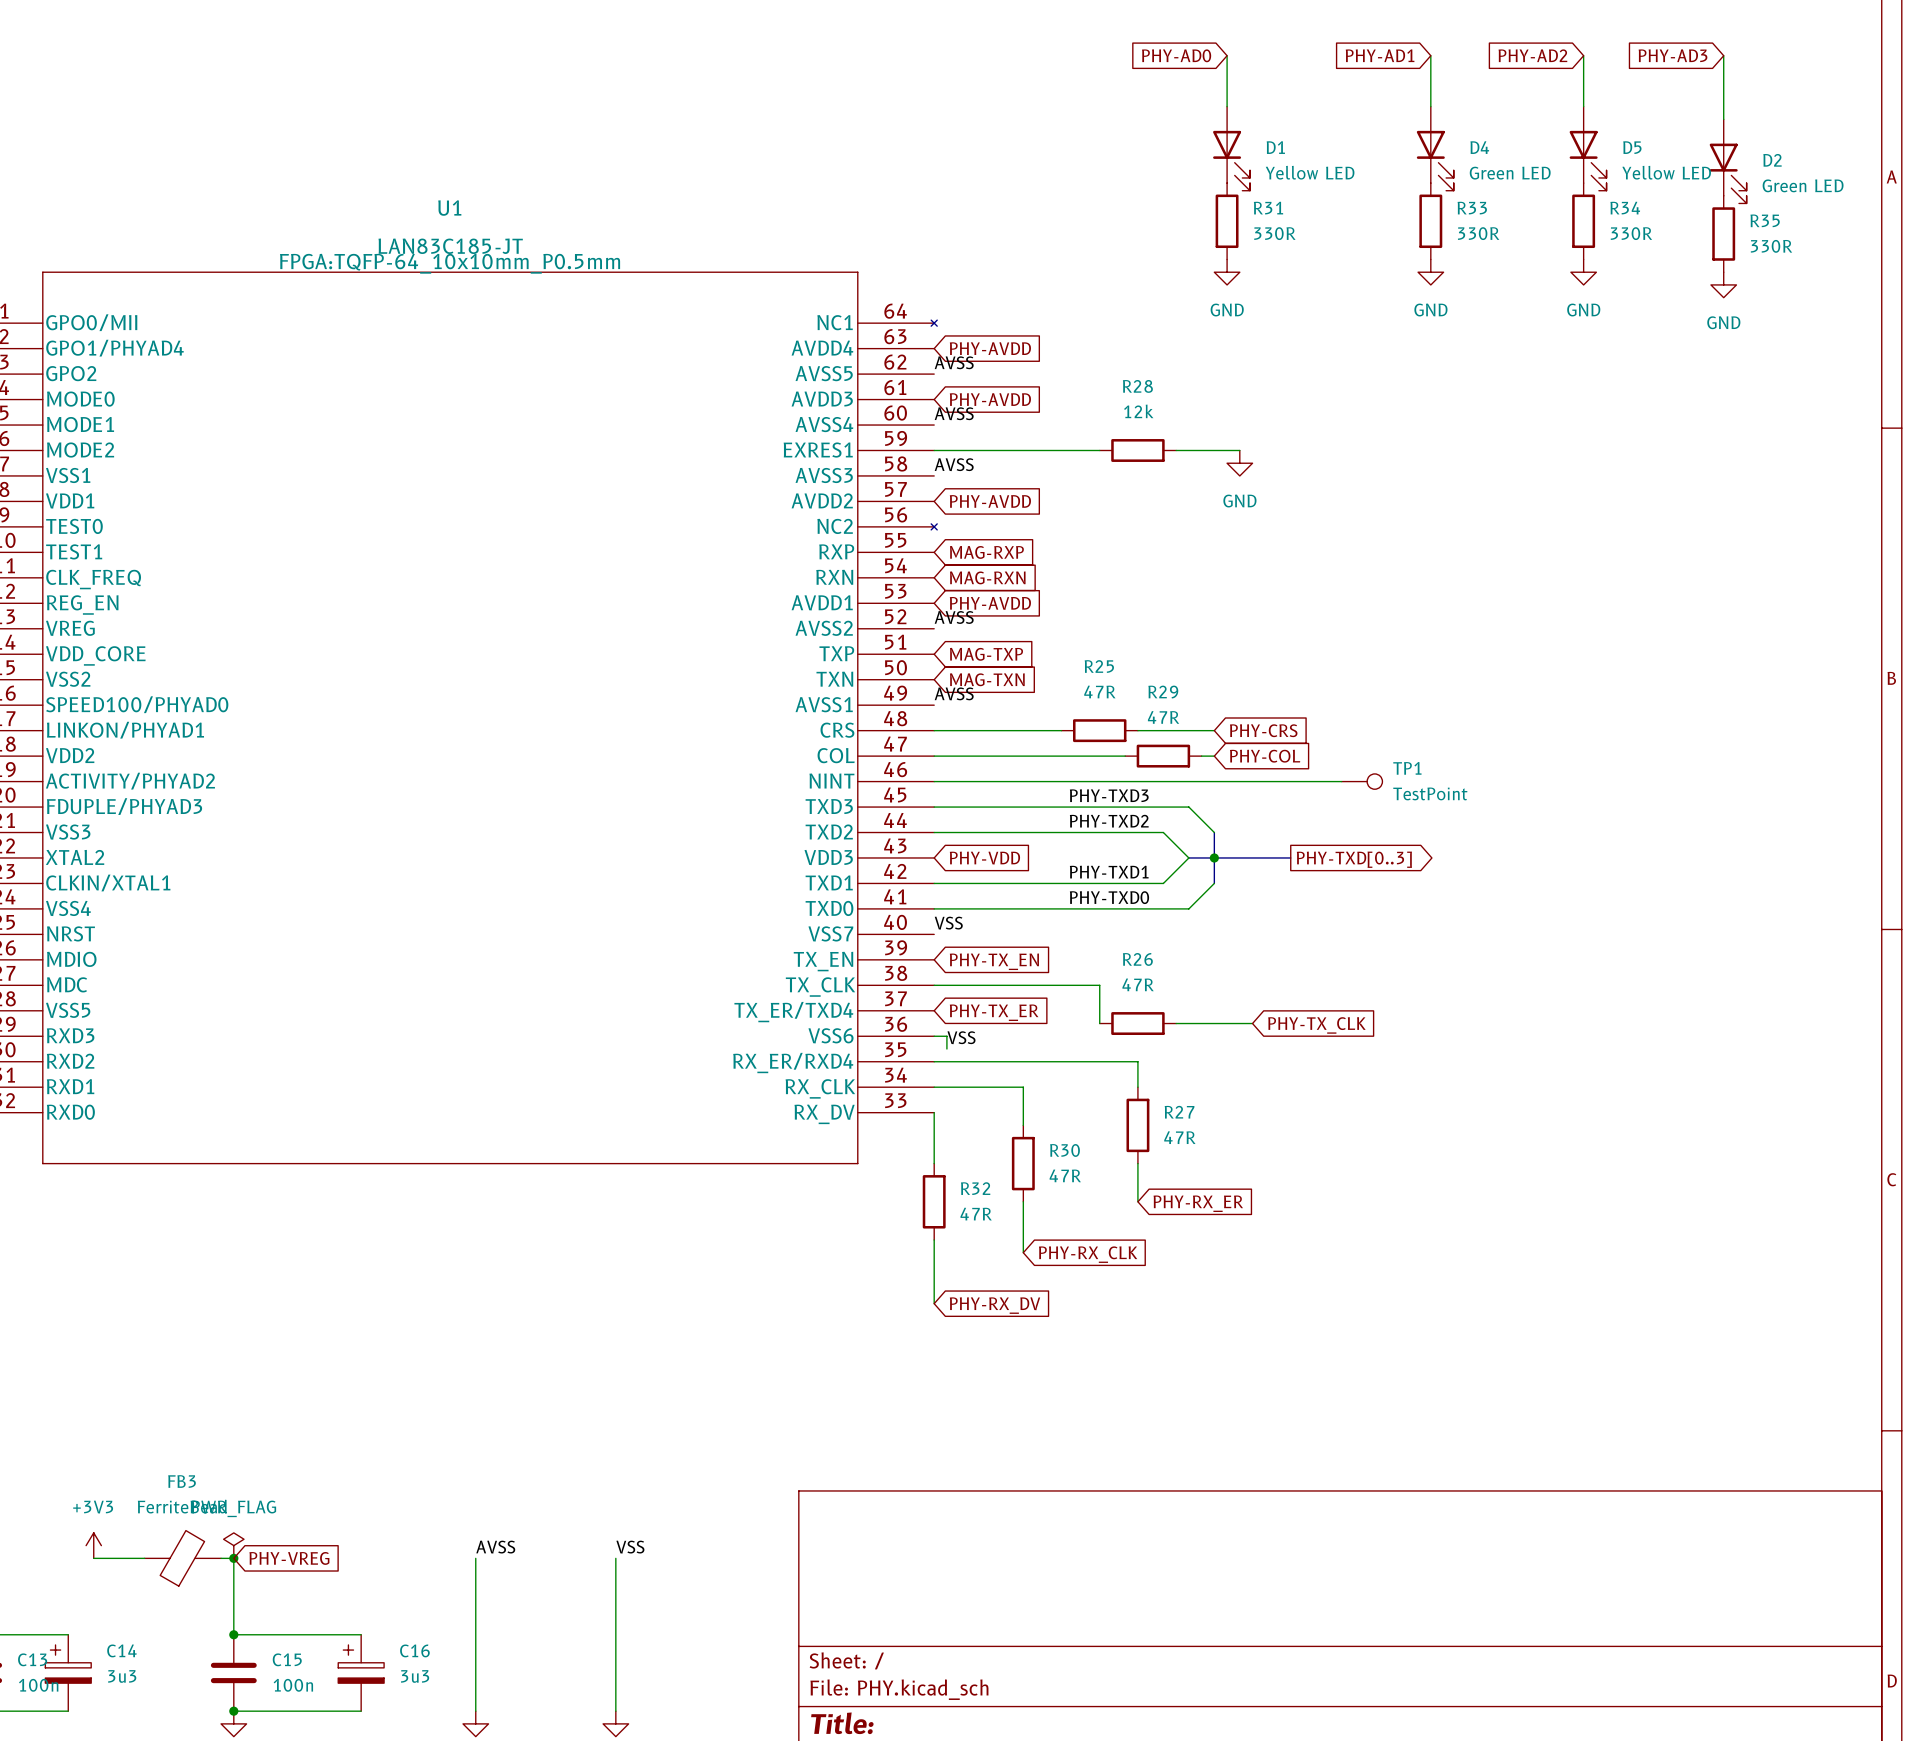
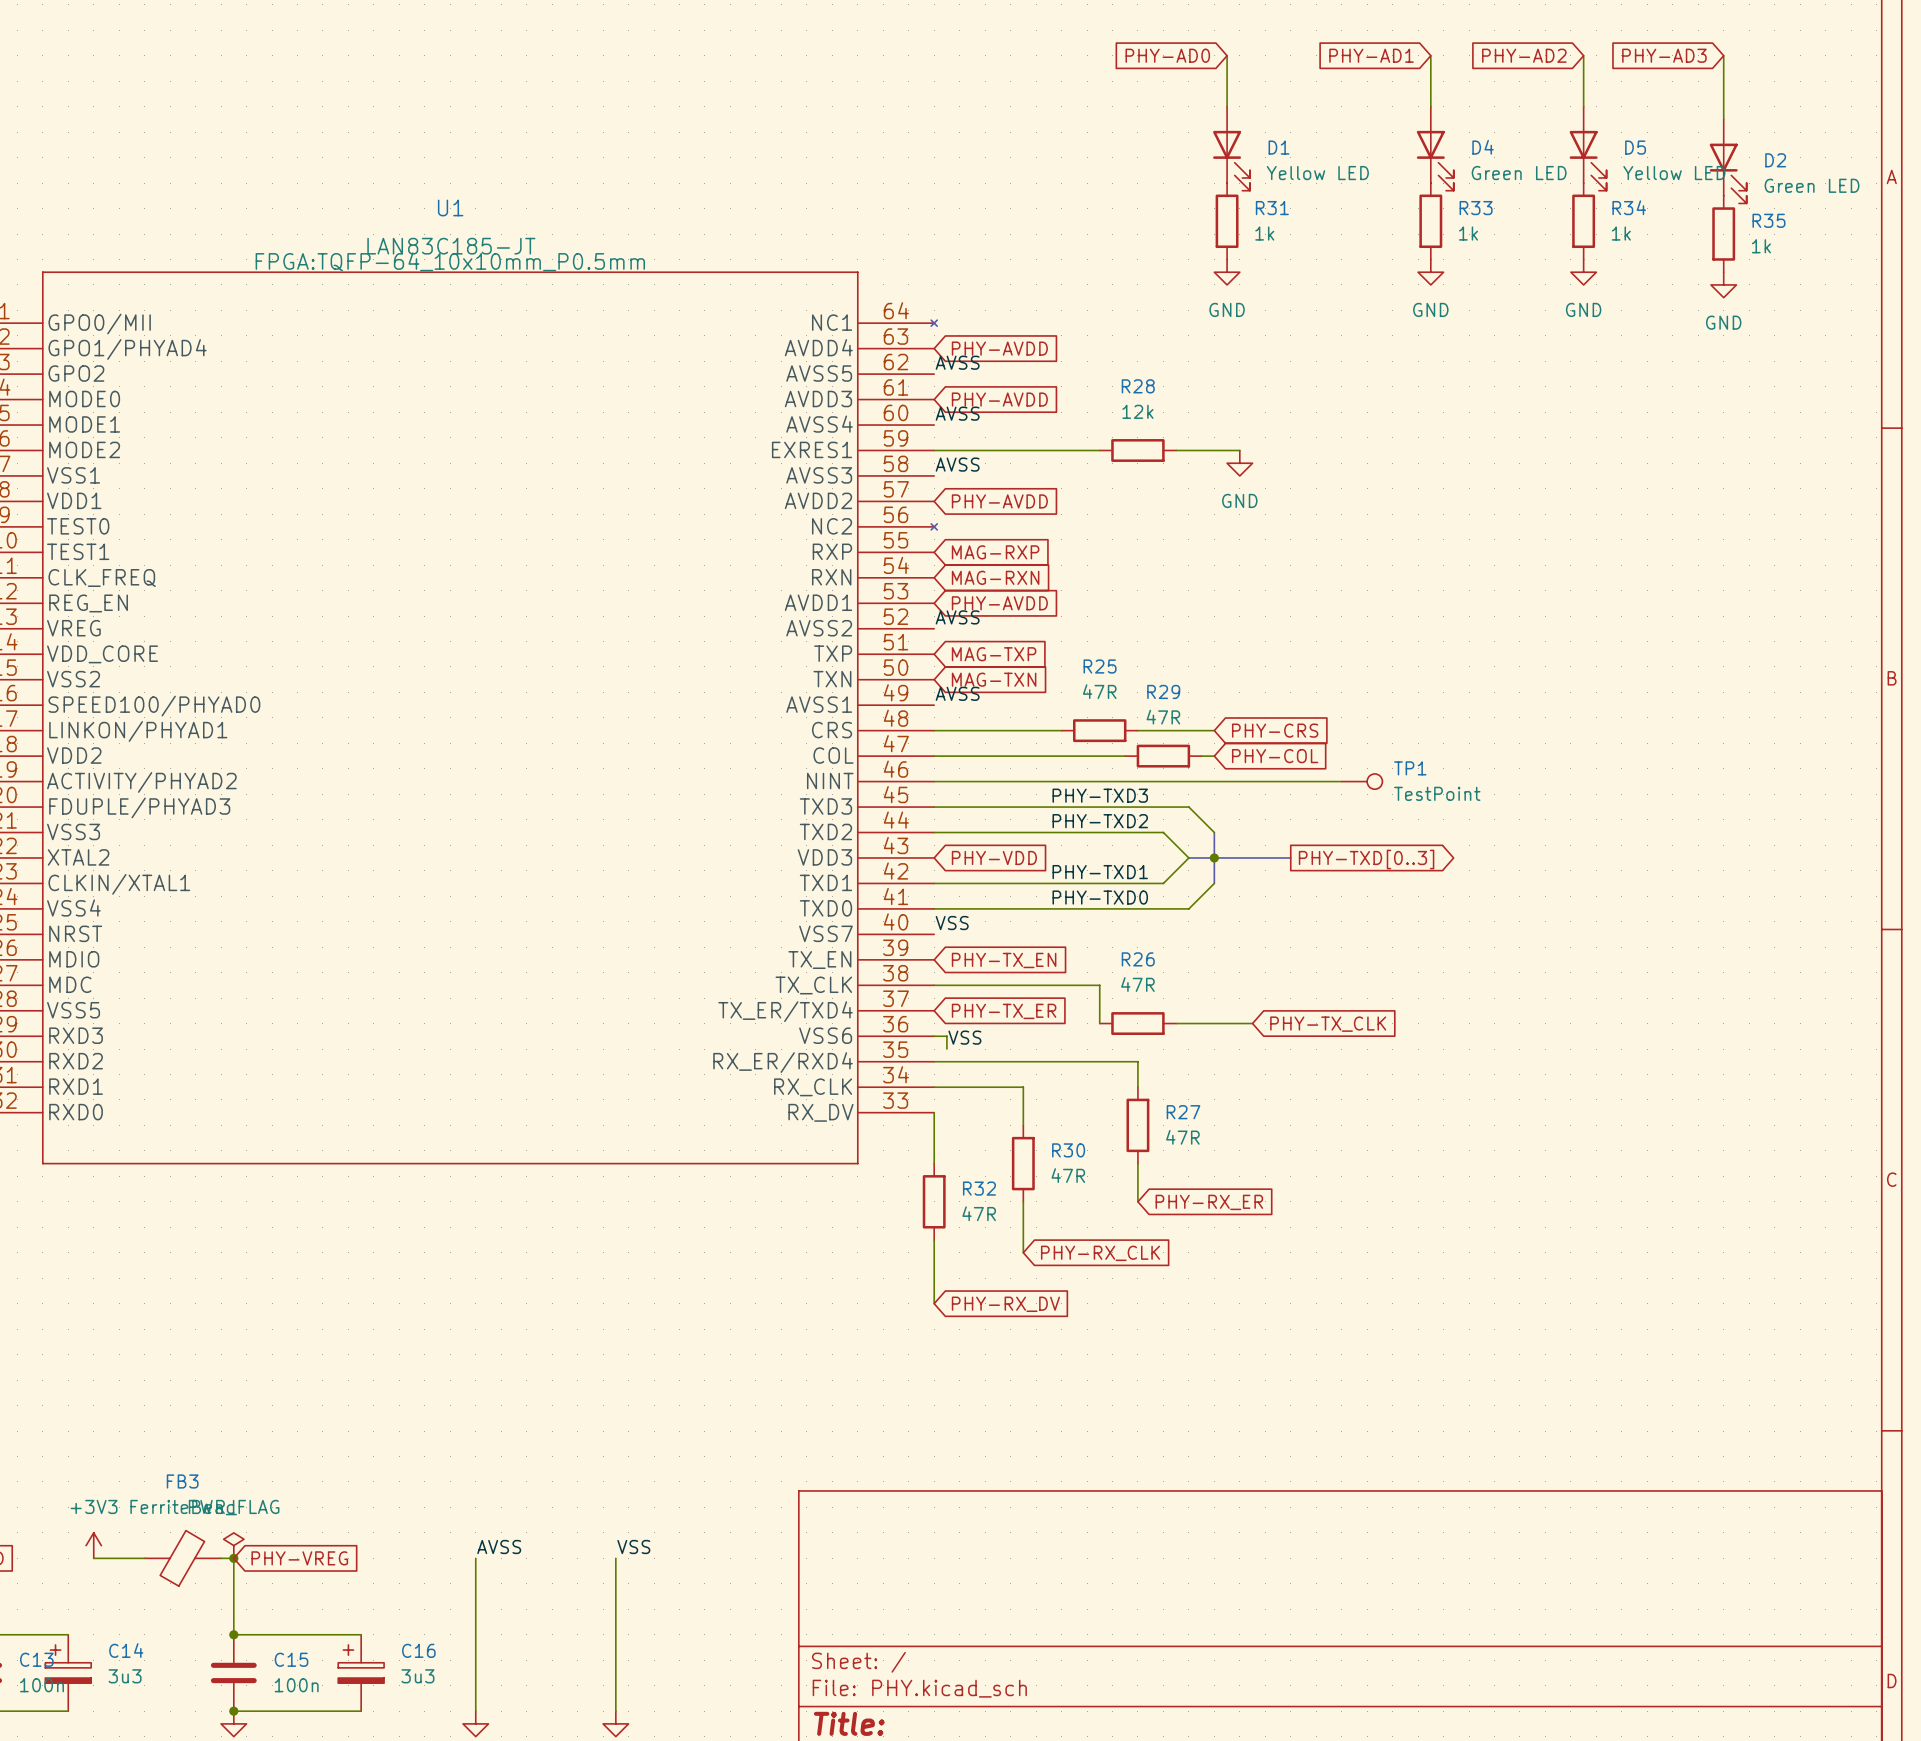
R31 value: 330R (1274, 233) -> 1k (1264, 233)
R33 value: 330R (1478, 233) -> 1k (1468, 233)
R34 value: 330R (1631, 233) -> 1k (1621, 233)
R35 value: 330R (1771, 246) -> 1k (1761, 246)

